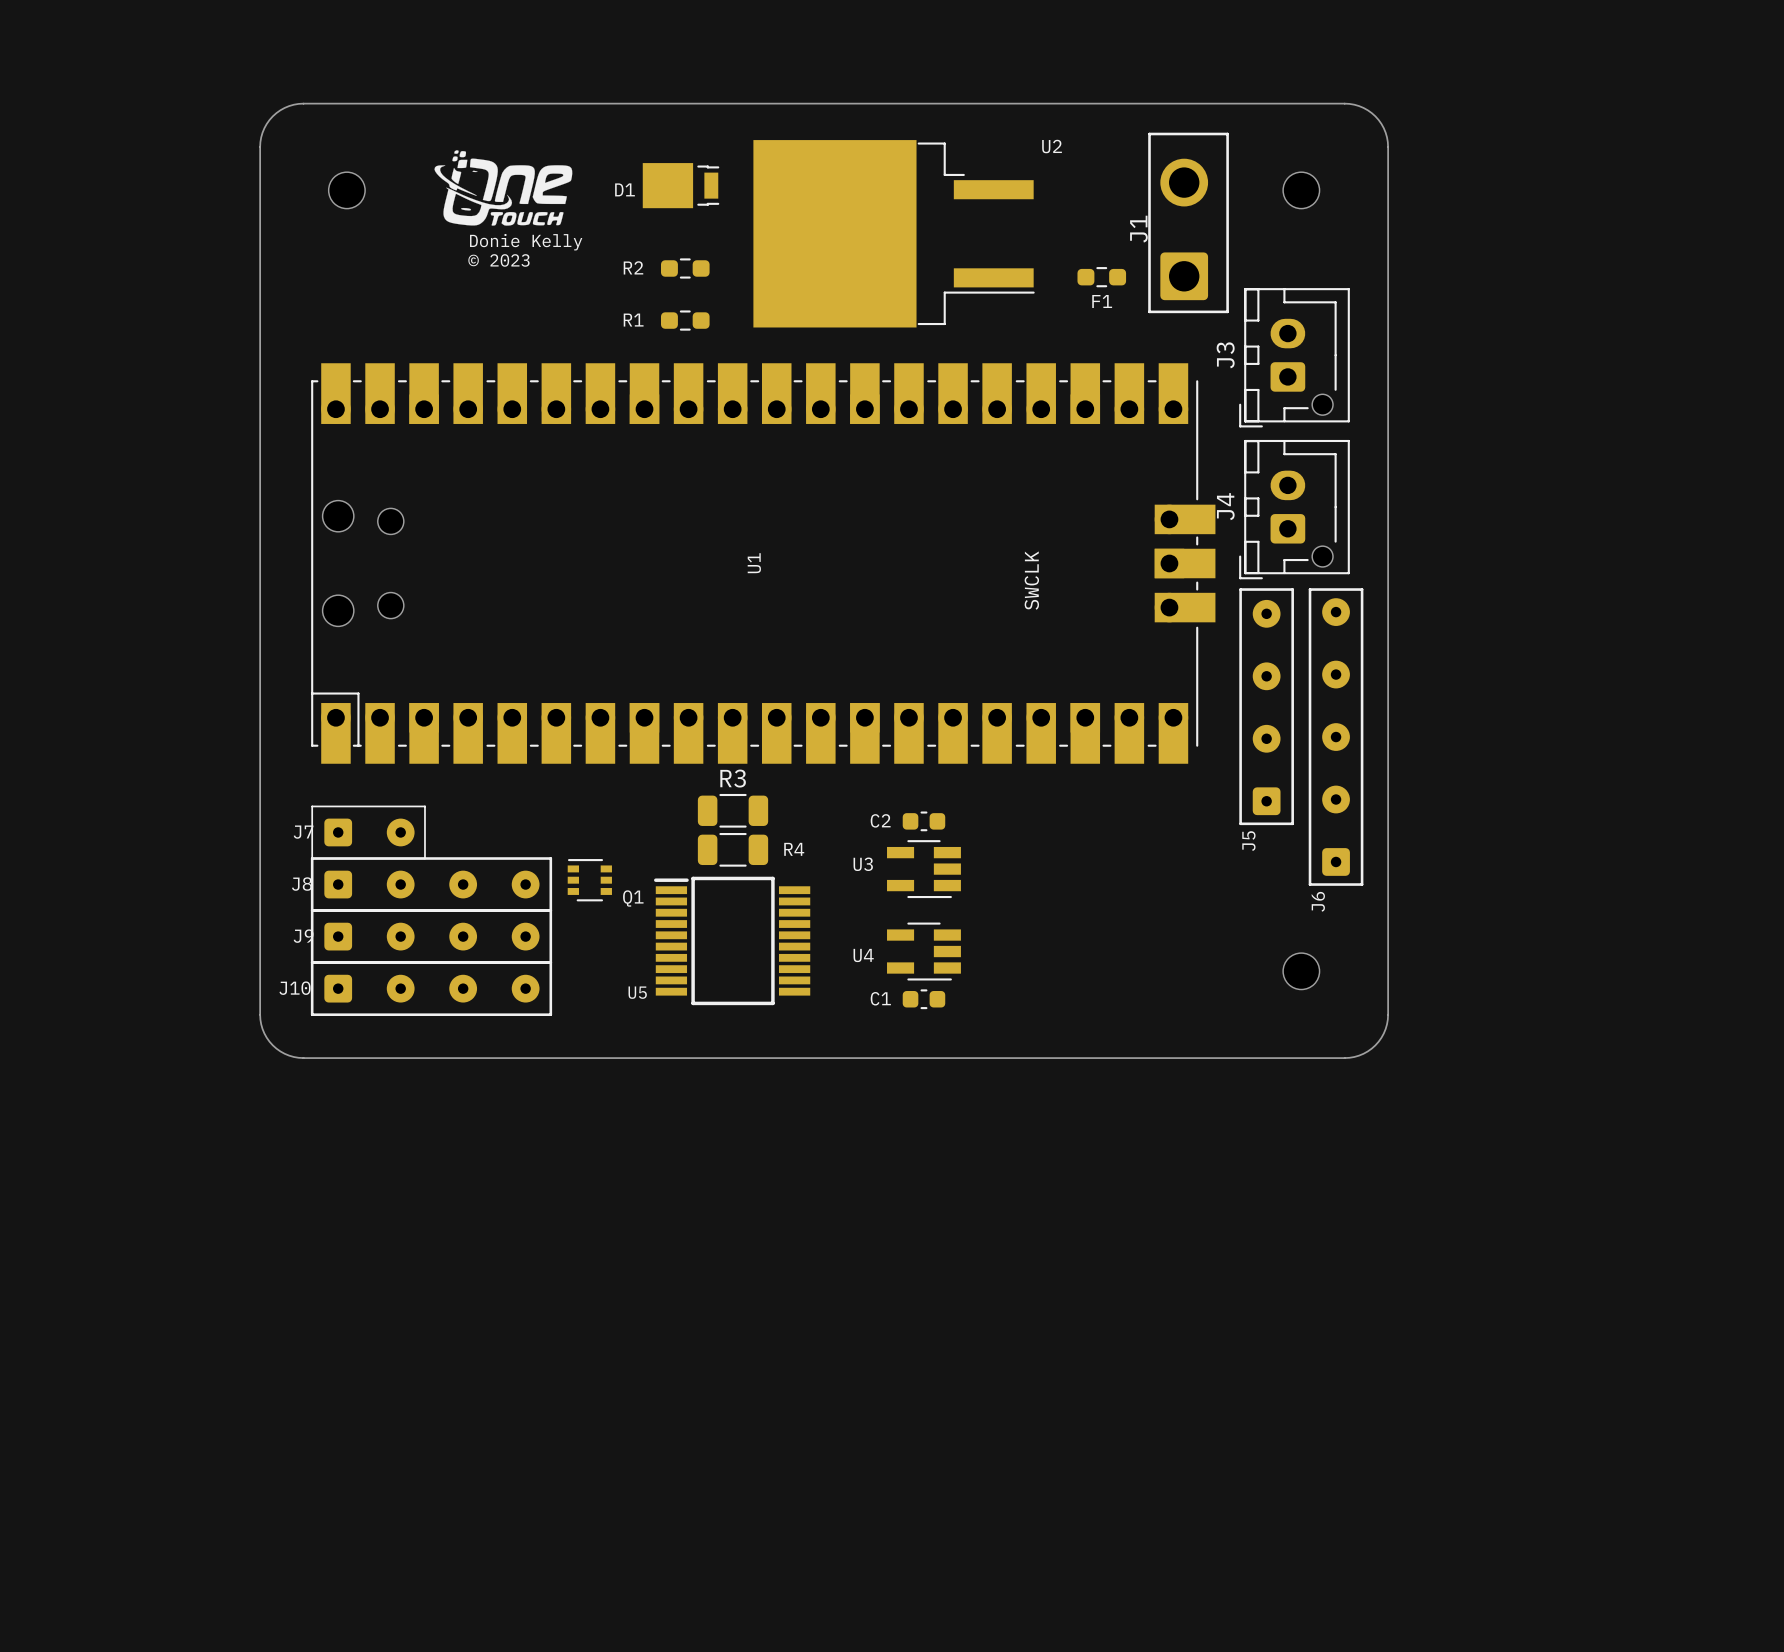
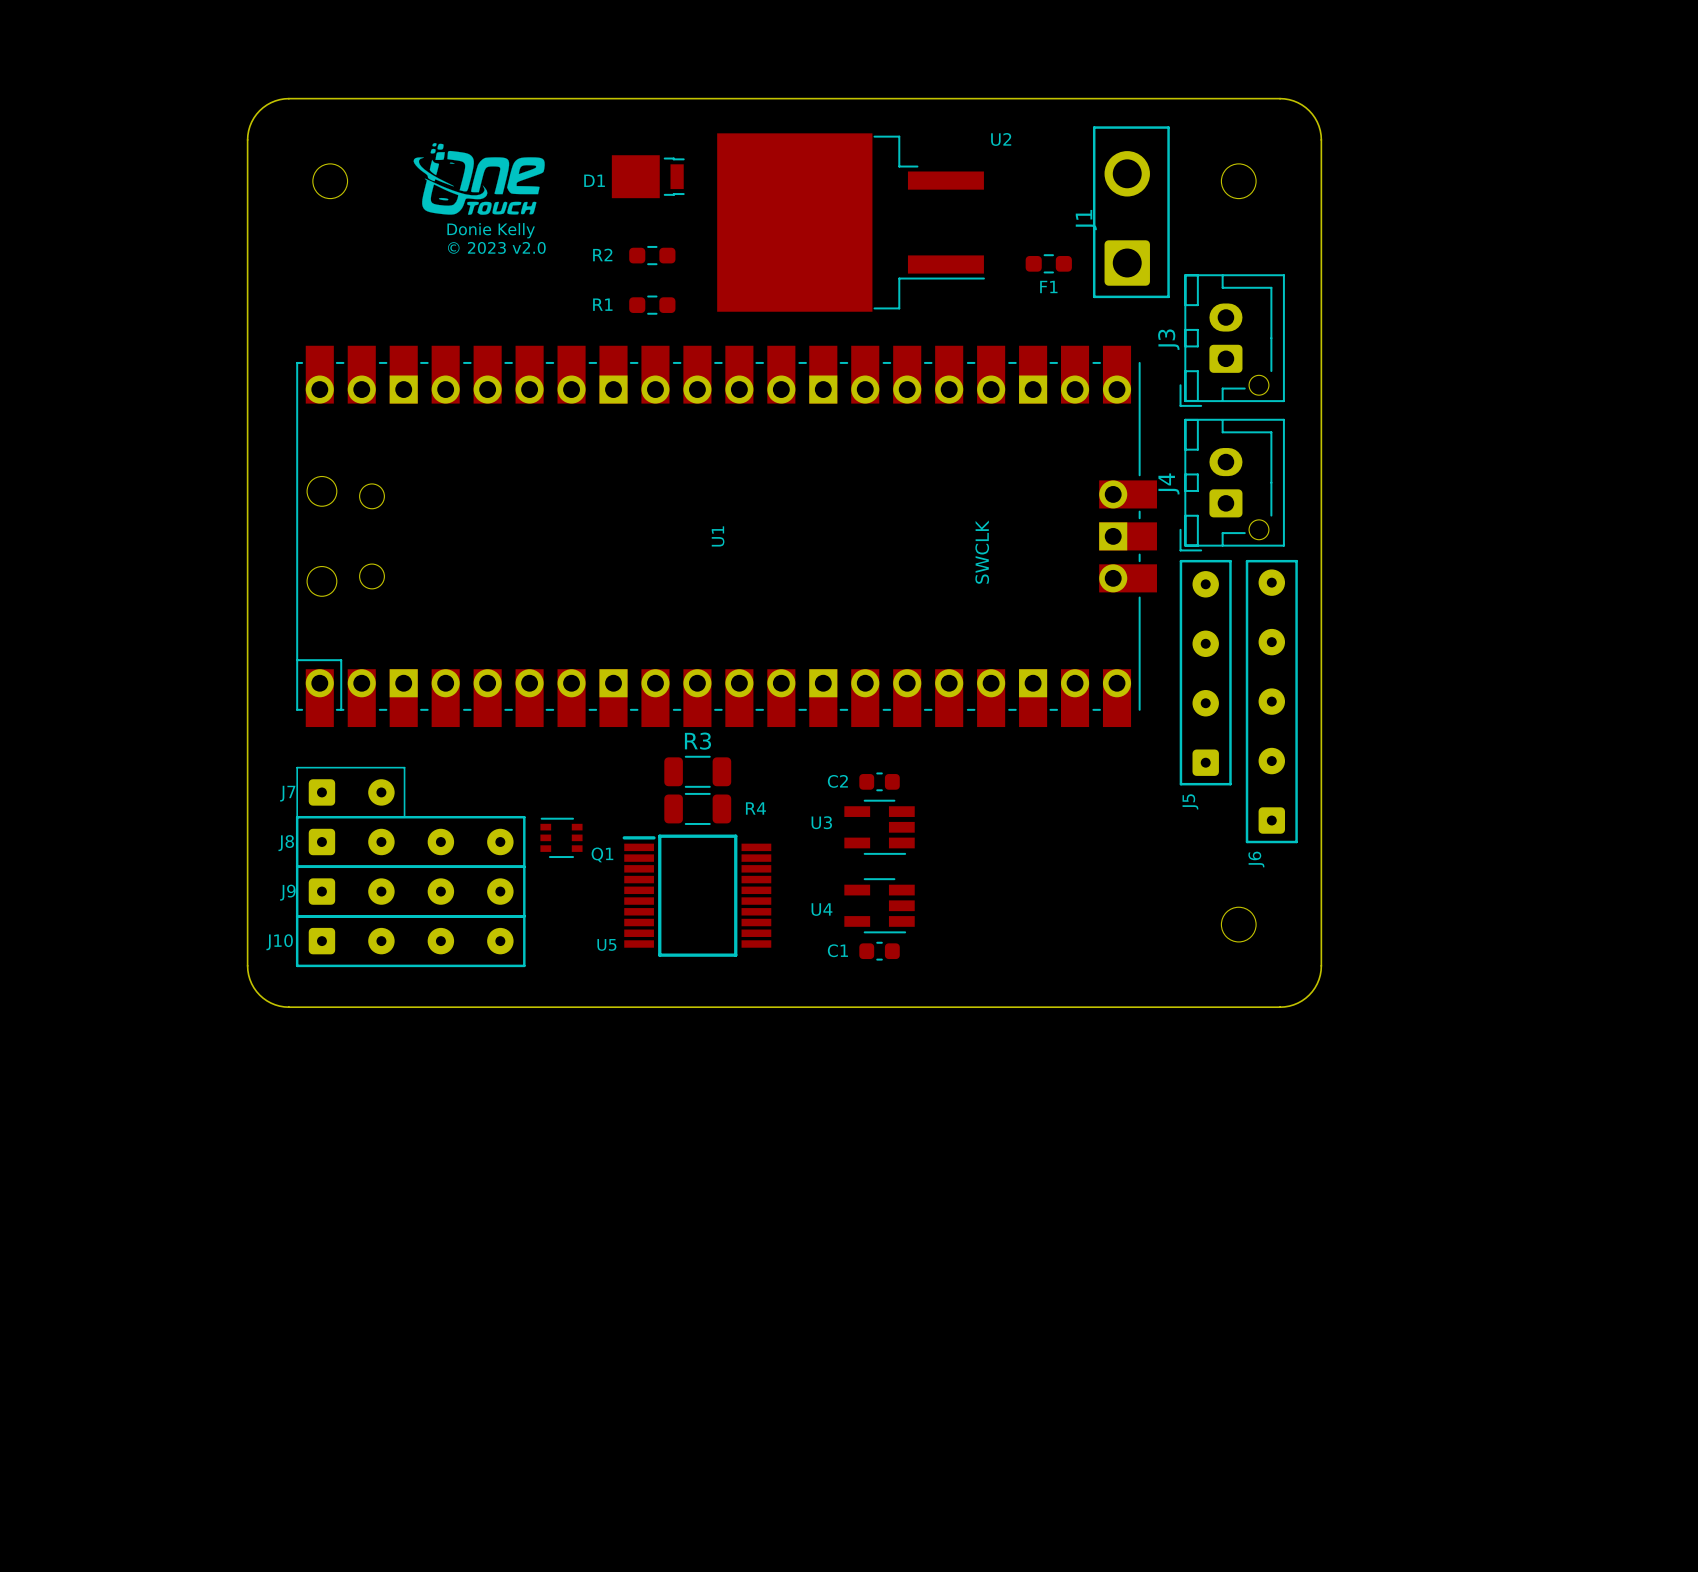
text: © 2023 (498, 260) -> © 2023 v2.0 (496, 247)

